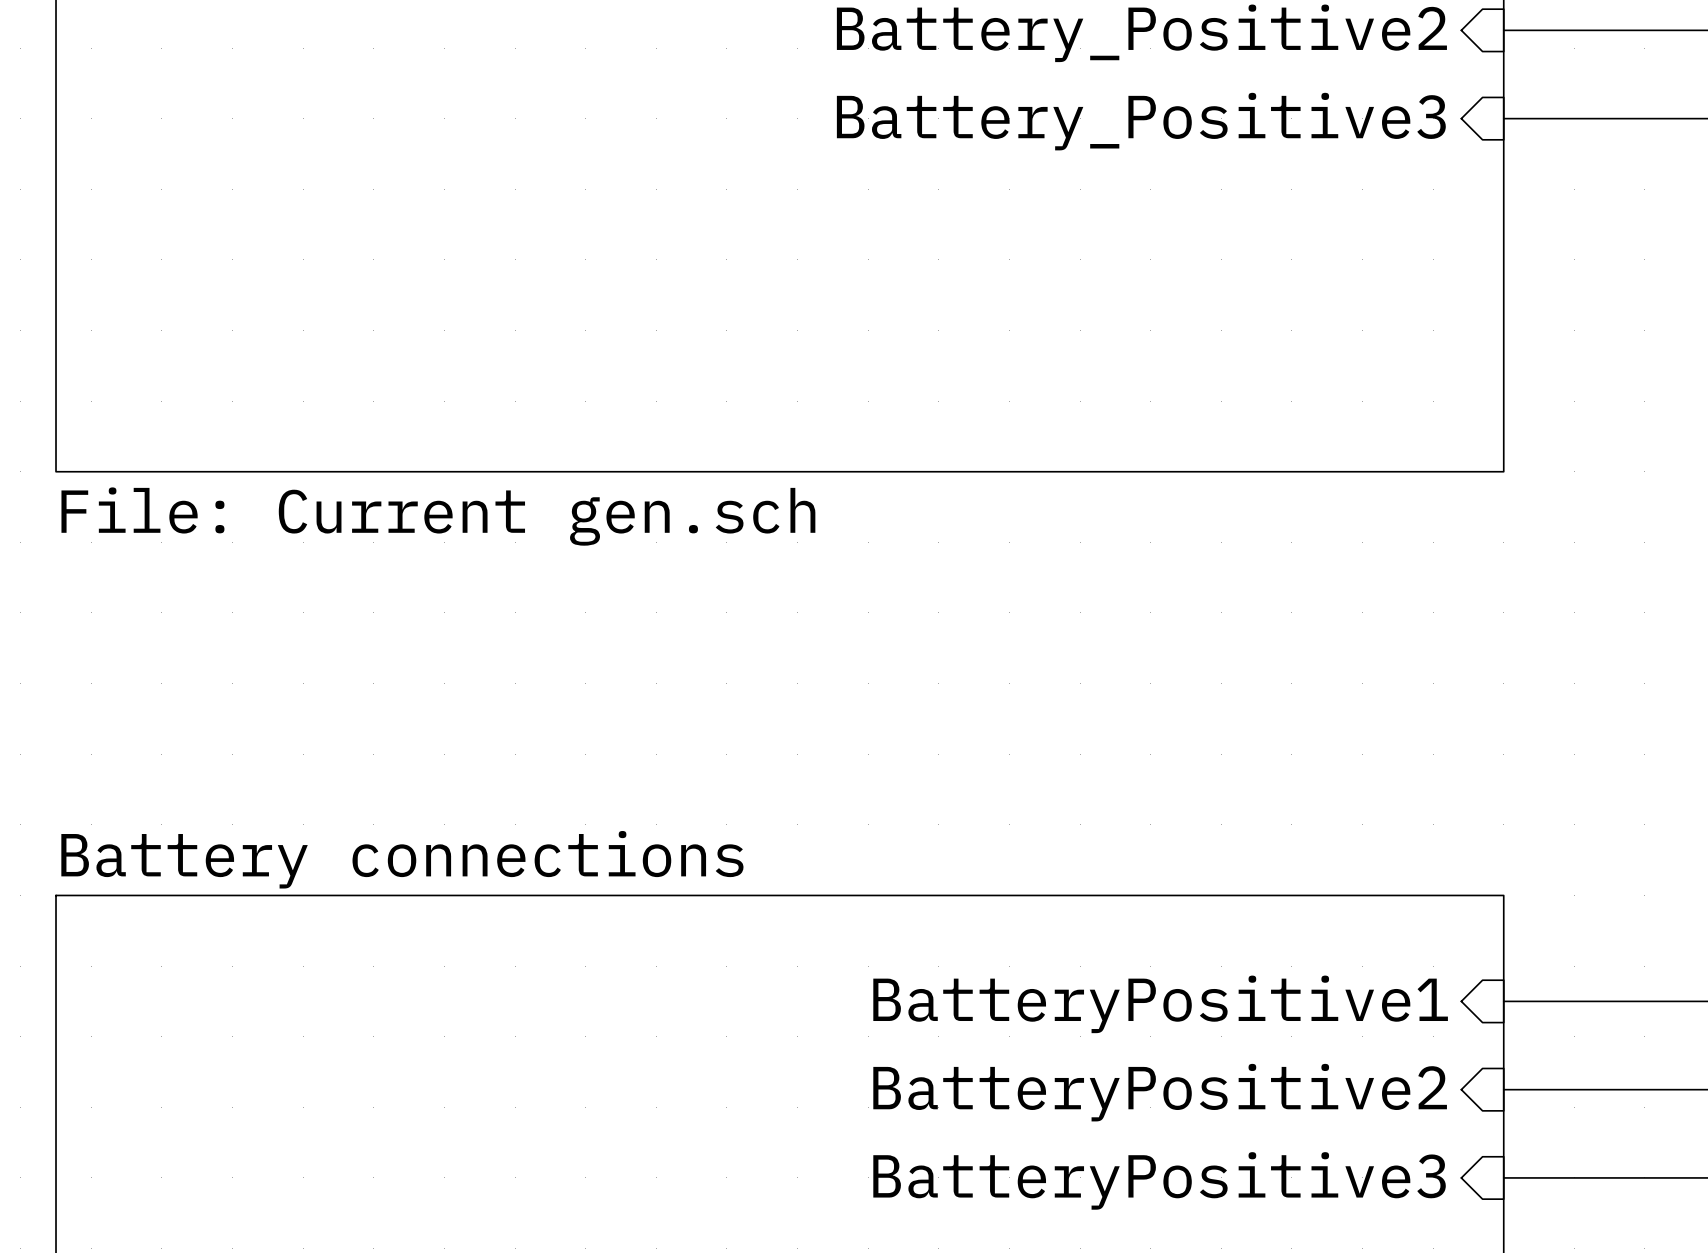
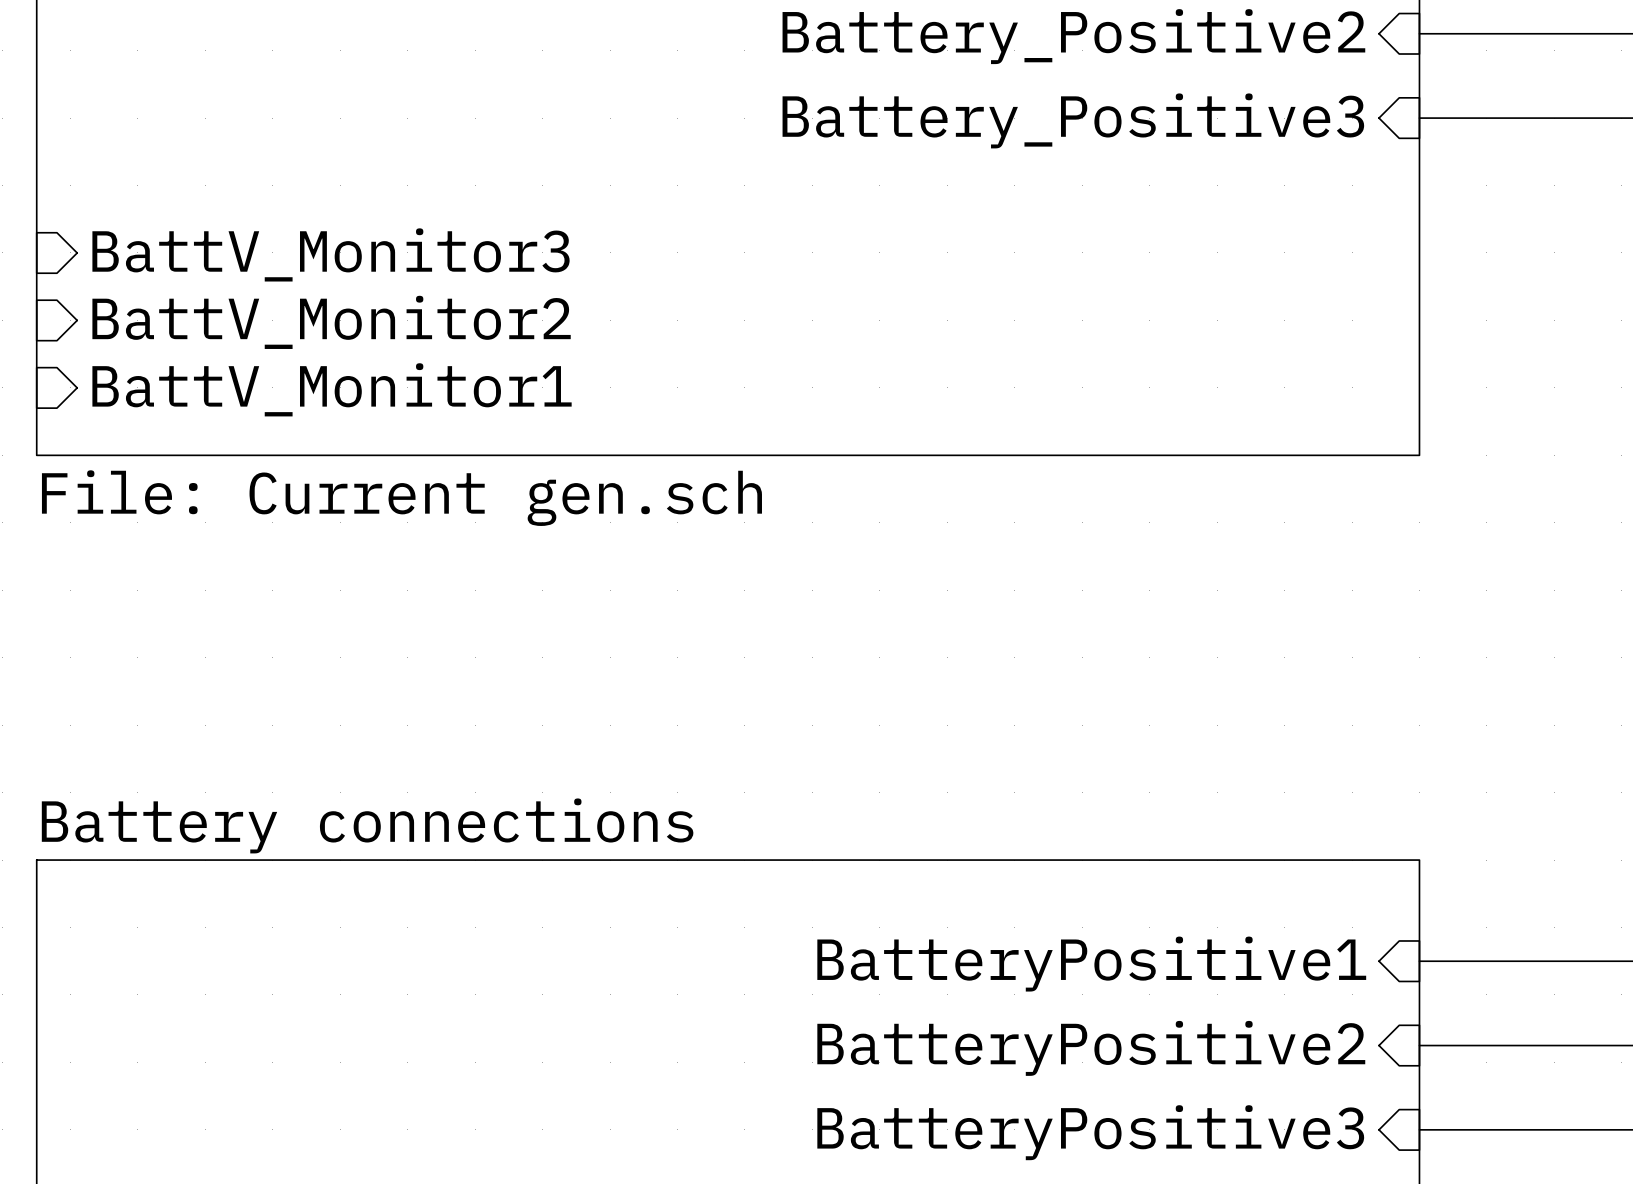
sheet pin: none -> BattV_Monitor3 (331, 254)
sheet pin: none -> BattV_Monitor2 (331, 322)
sheet pin: none -> BattV_Monitor1 (332, 389)

